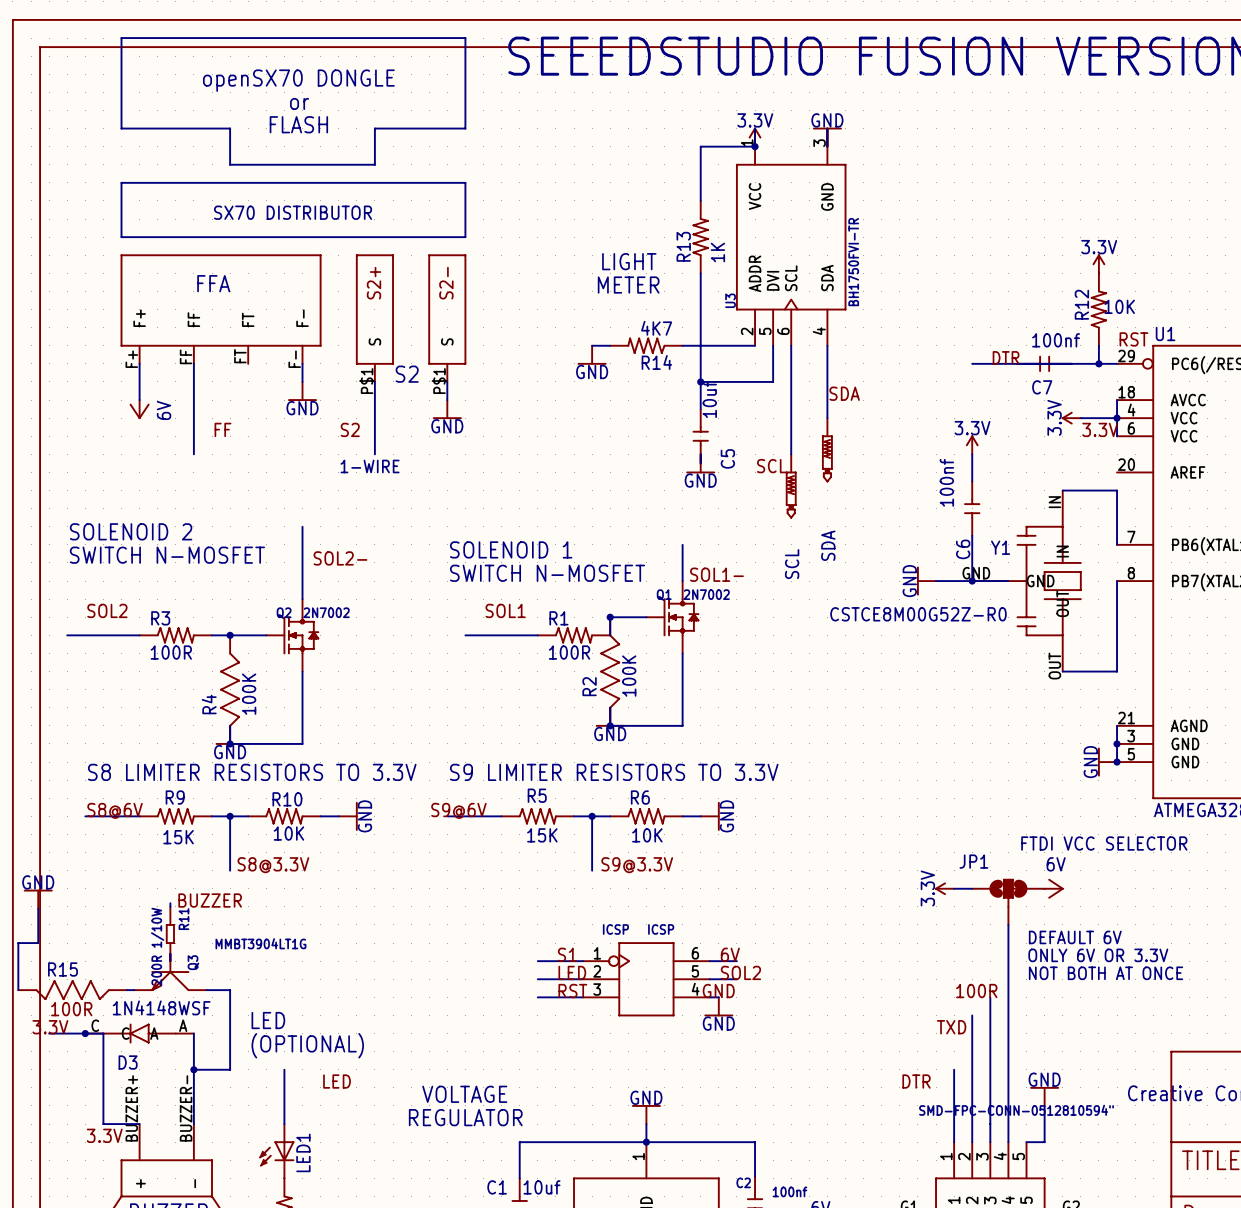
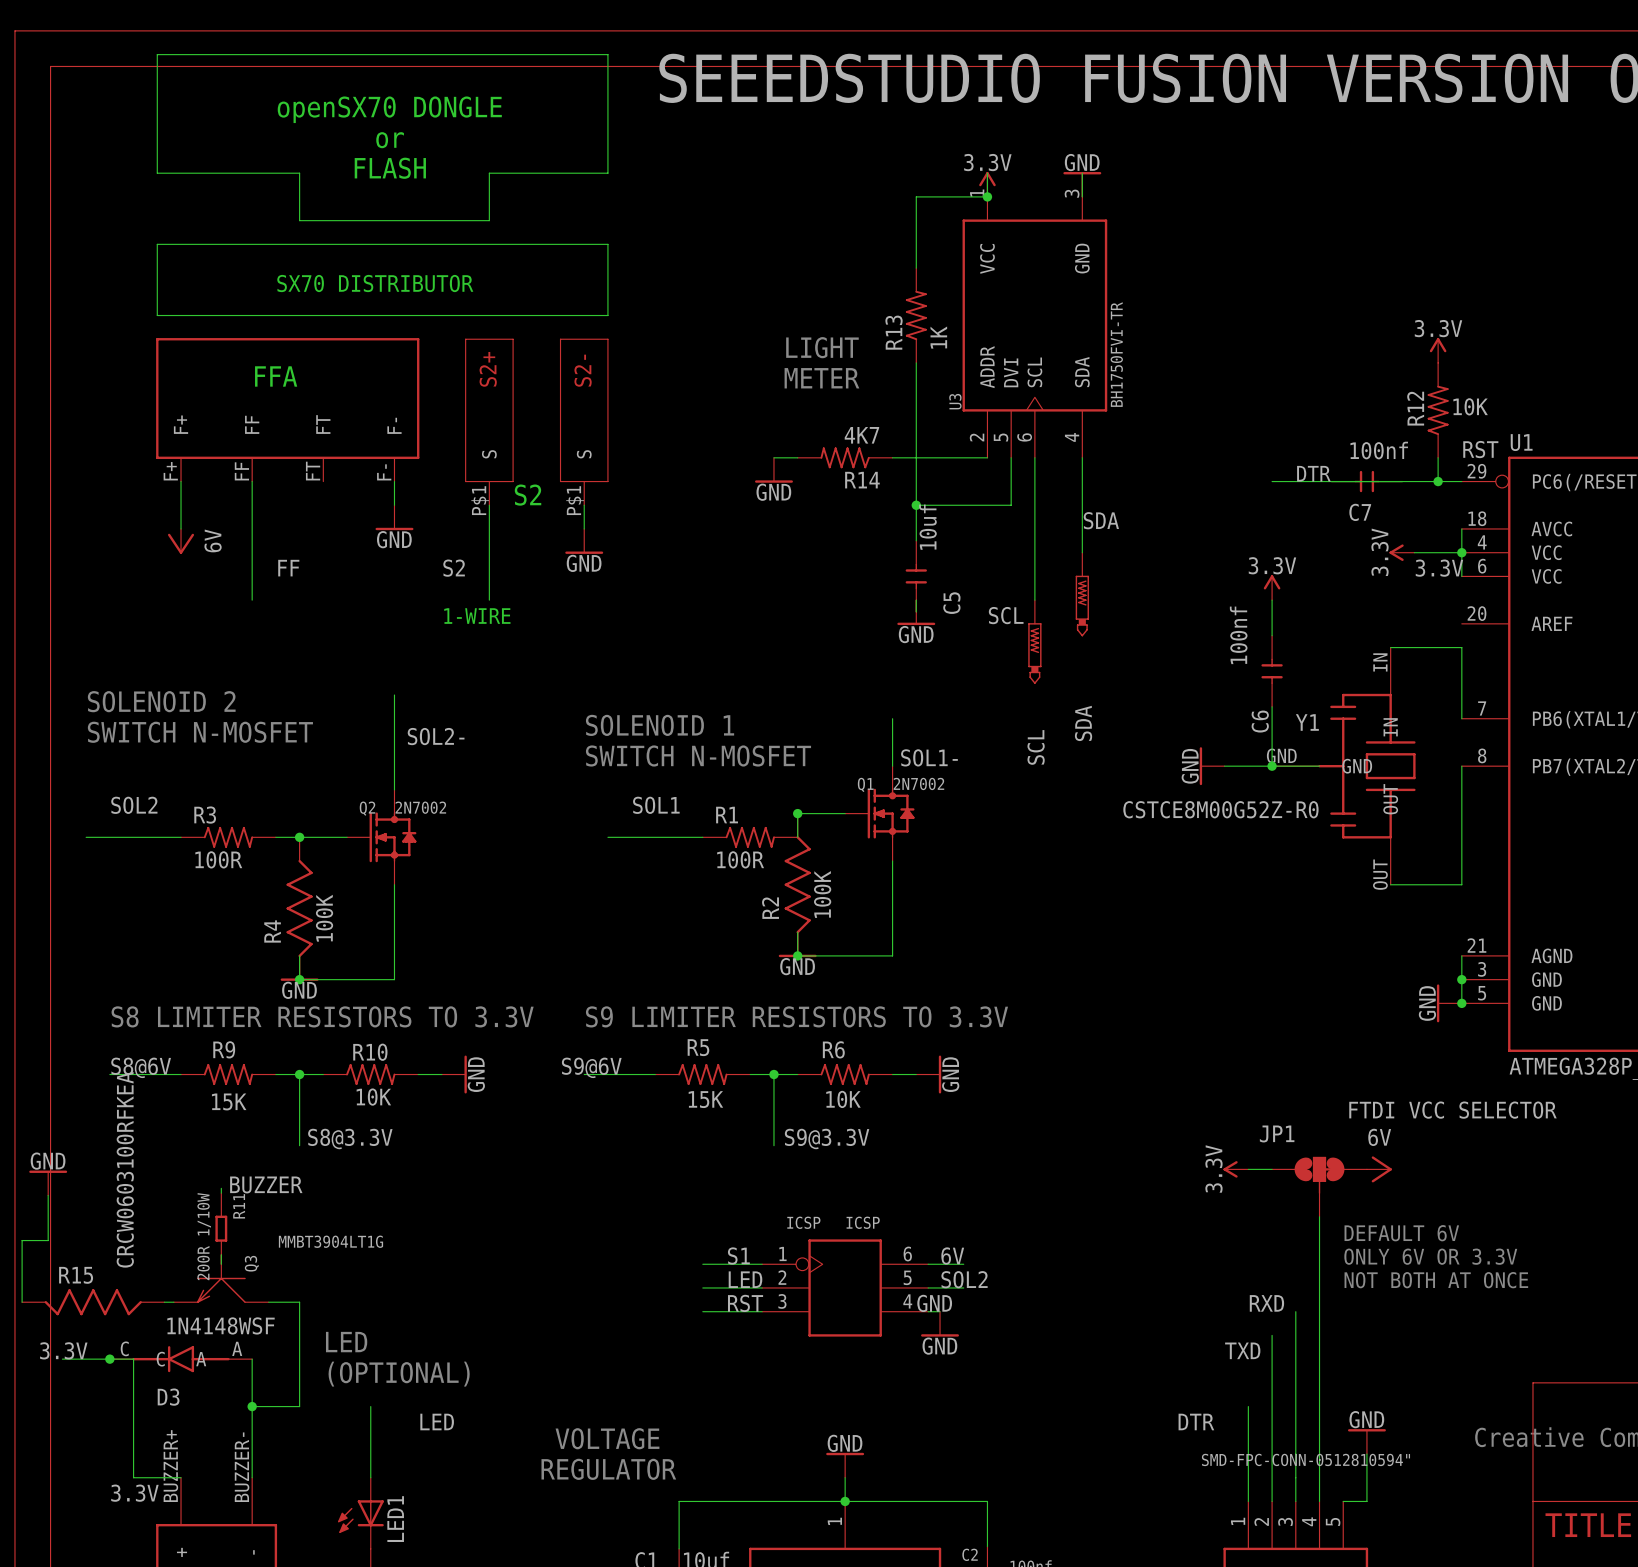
R15 value: none -> CRCW0603100RFKEA (125, 1169)
label: 100R (976, 991) -> RXD (1266, 1303)
label: 100R (71, 1009) -> none

